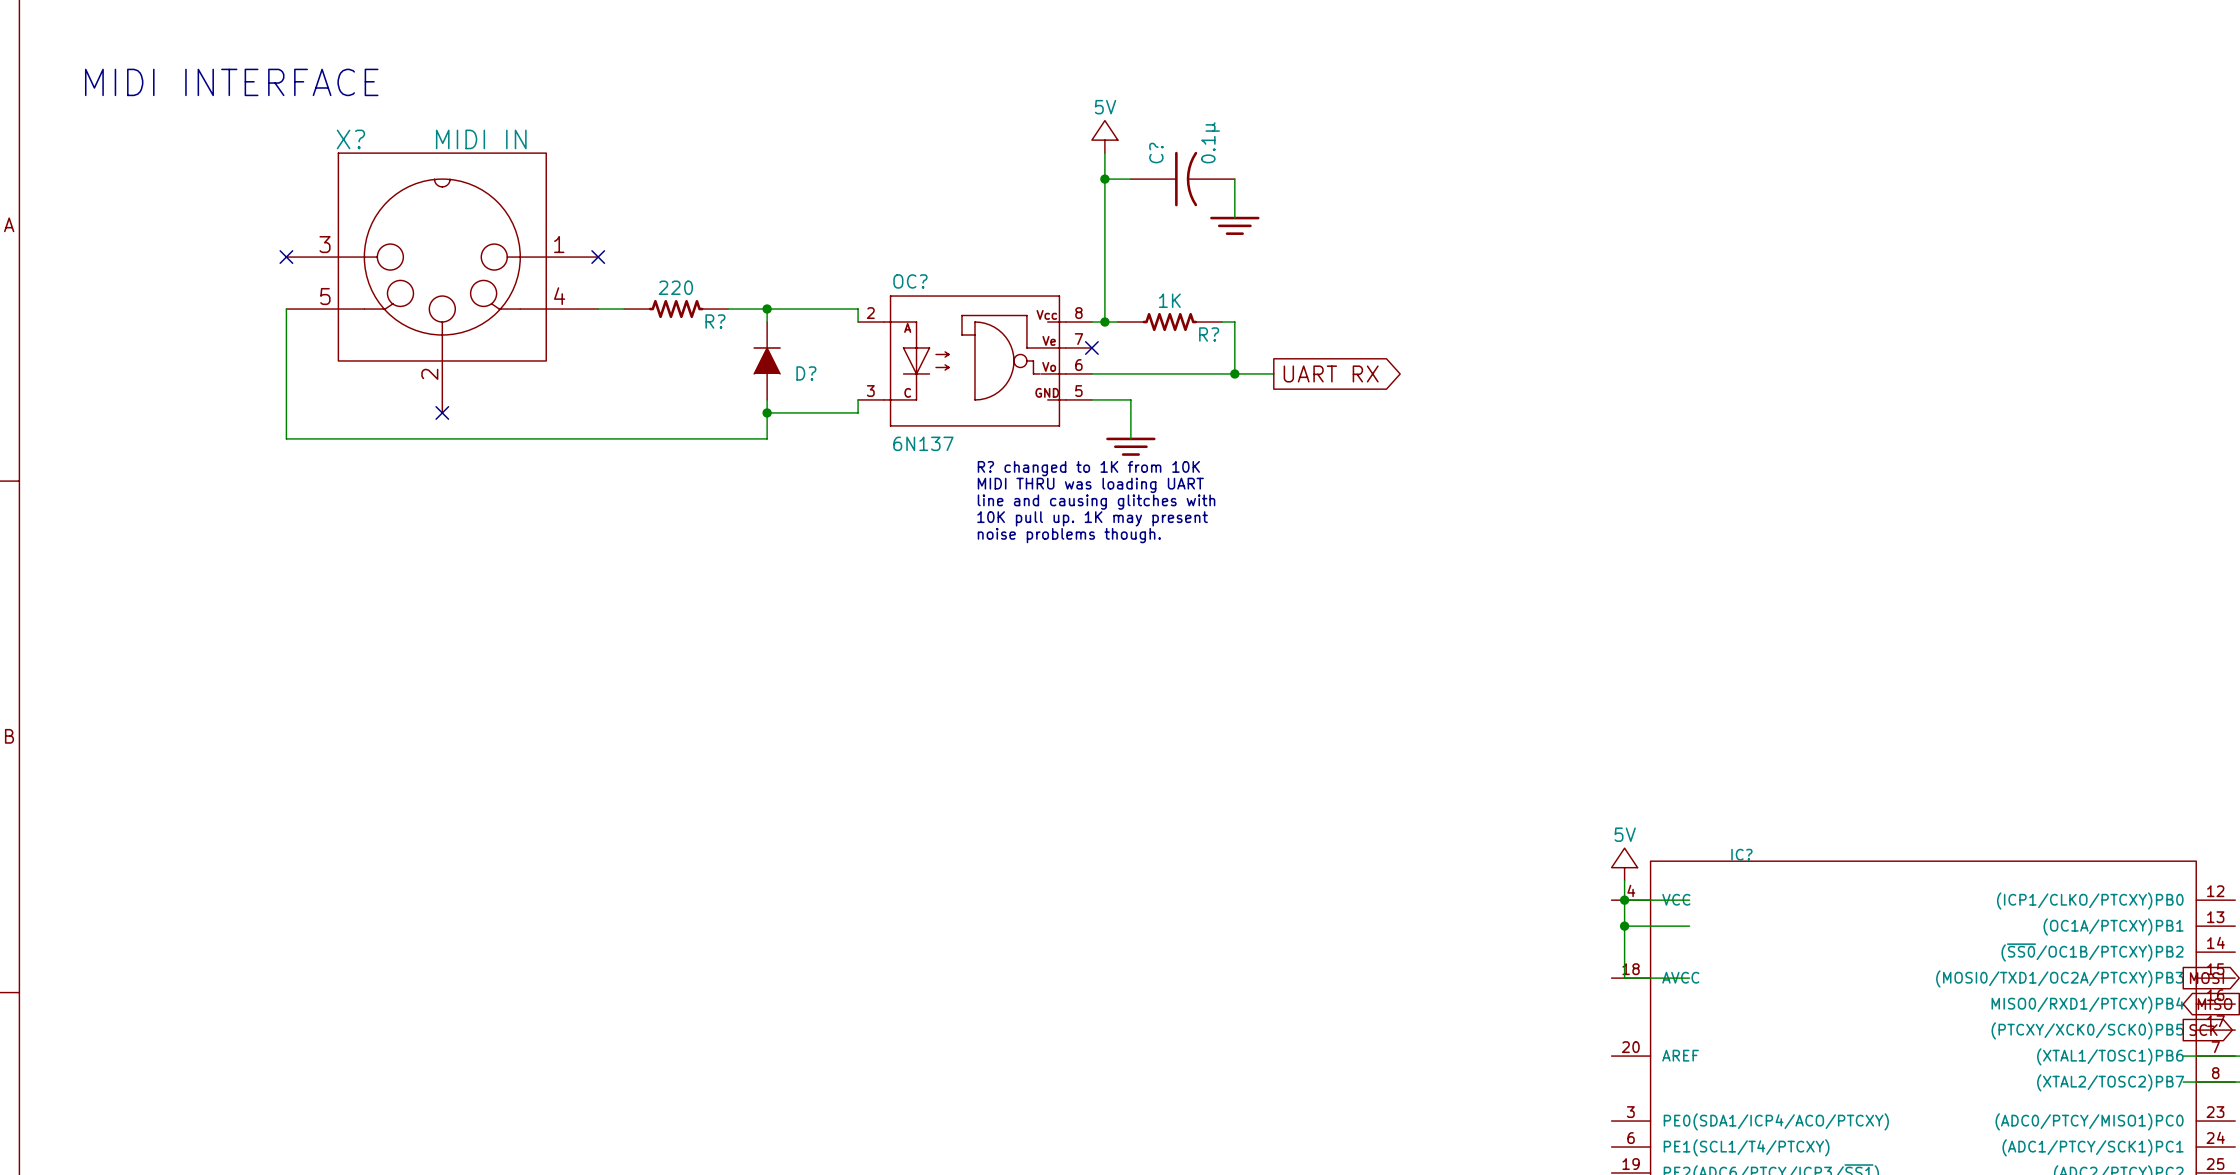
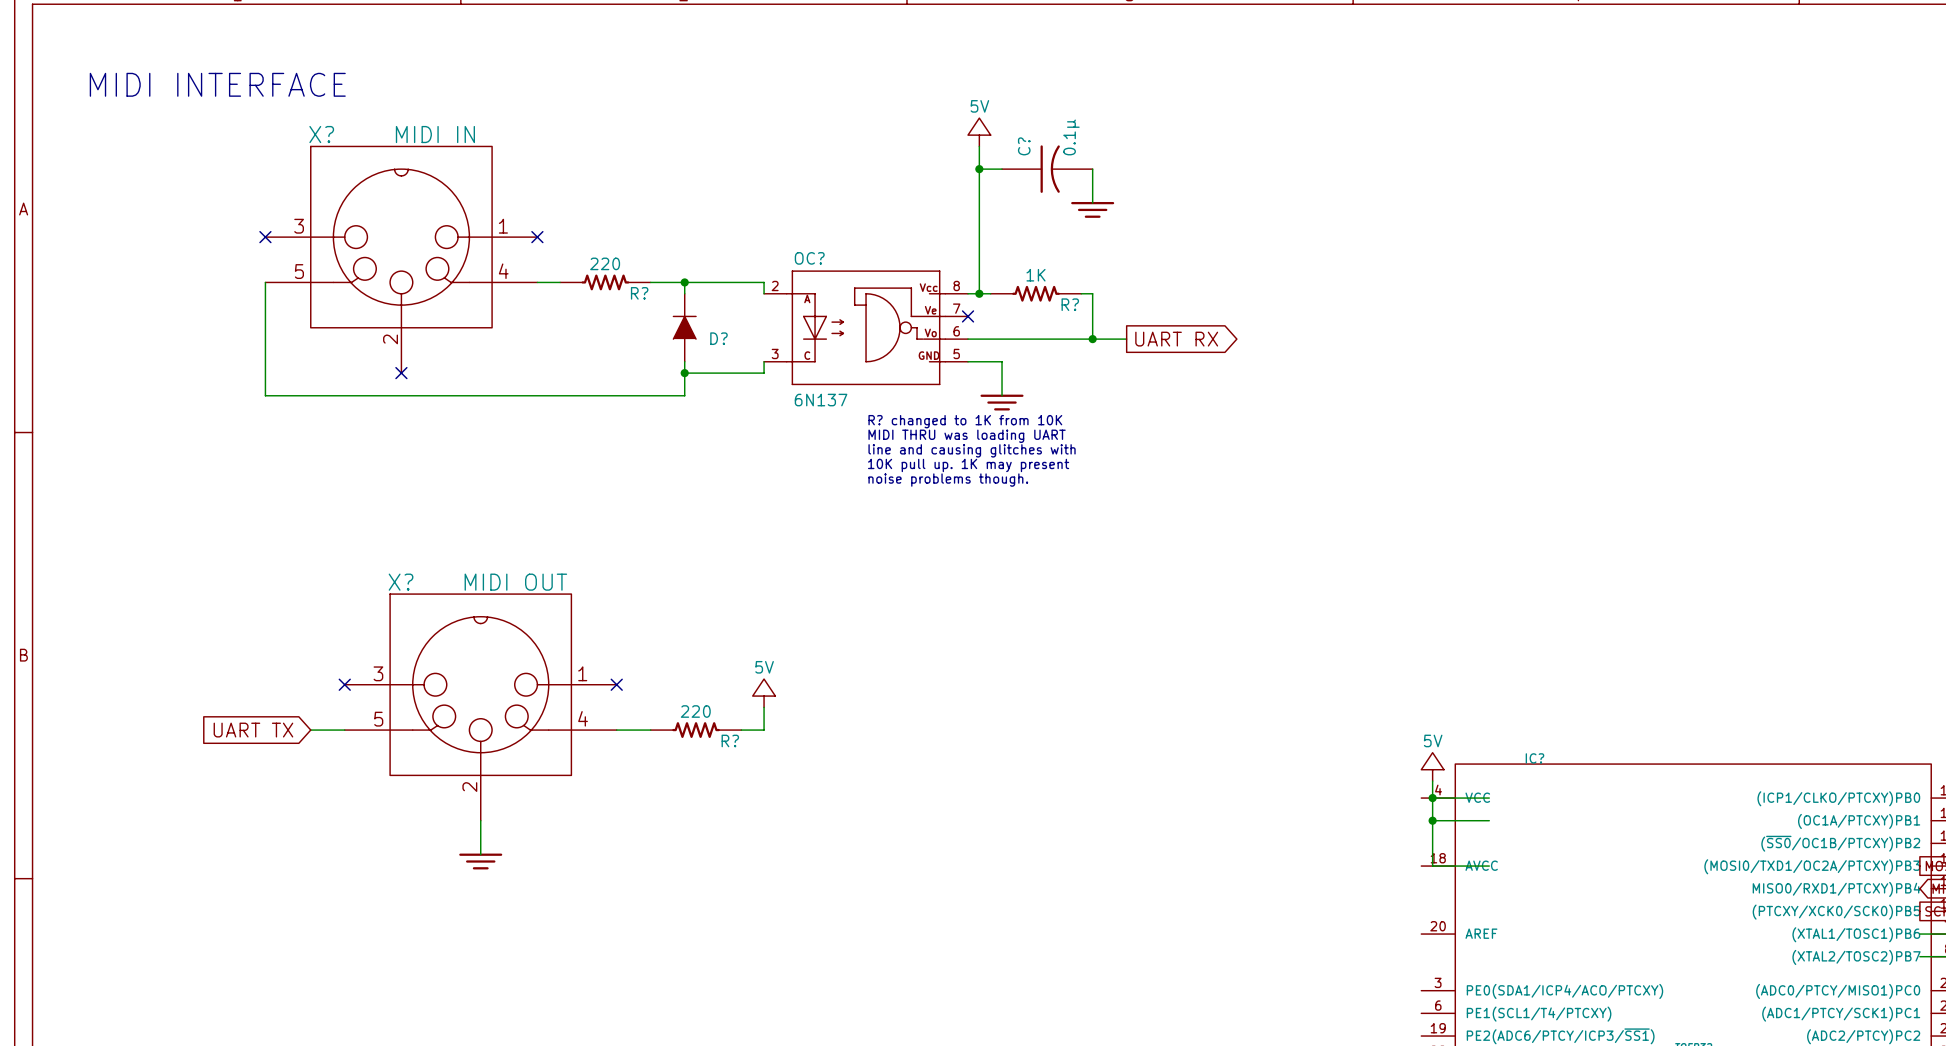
no-connect mark: none -> (344, 684)
no-connect mark: none -> (616, 684)
power symbol: none -> 5V (764, 693)
X?: none -> MIDI OUT (480, 707)
wire: none -> (764, 707) (764, 730) (741, 730)
global label: none -> UART TX (253, 730)
wire: none -> (310, 730) (344, 730)
wire: none -> (616, 730) (650, 730)
R?: none -> 220 (696, 730)
wire: none -> (480, 820) (480, 854)
power symbol: none -> (480, 861)

